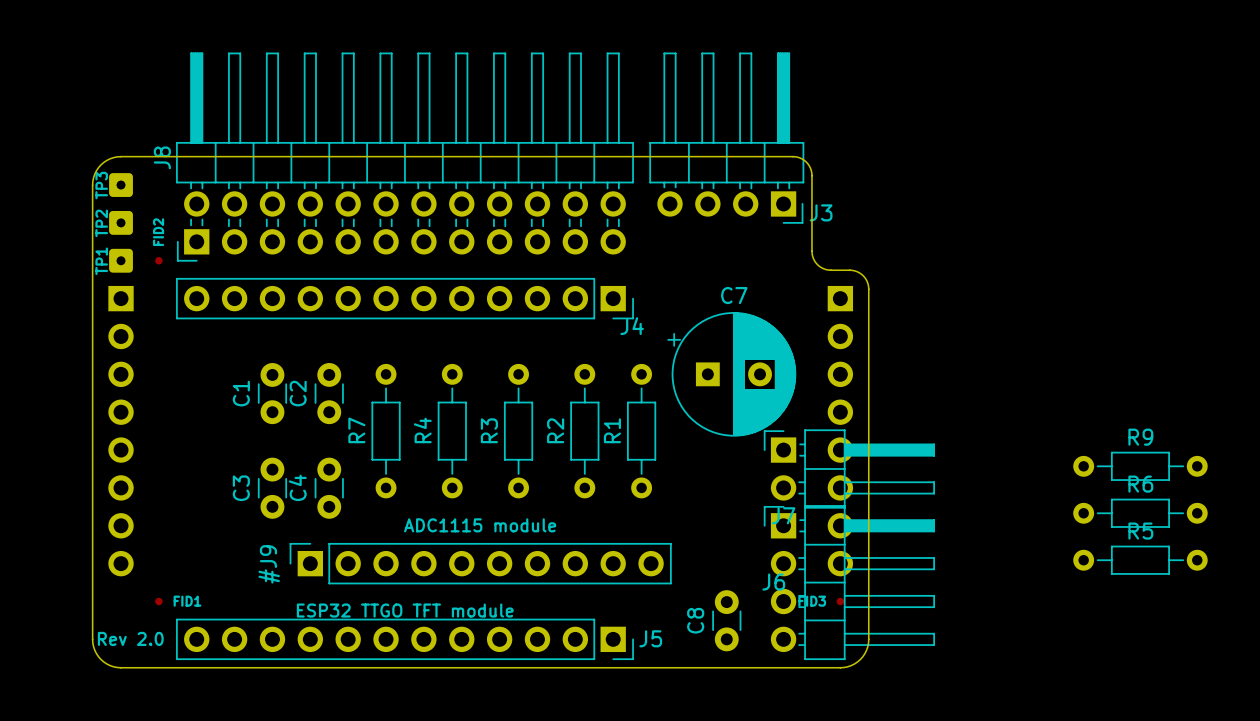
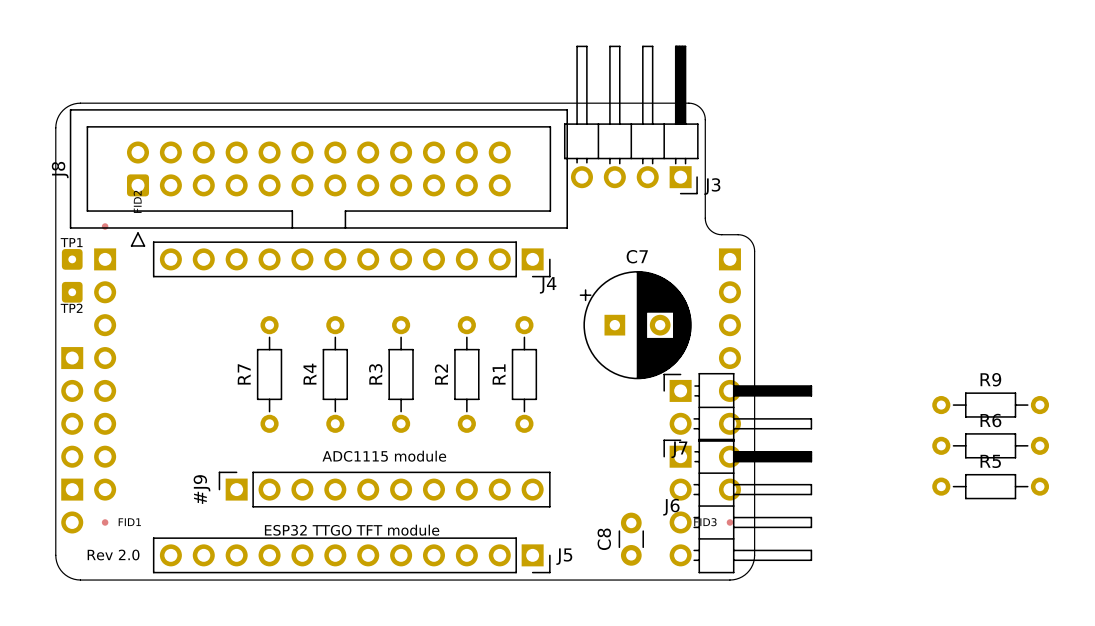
J8 footprint: [176, 52, 634, 262] -> [69, 109, 568, 247]
J8 name position: J8 (162, 157) -> J8 (60, 170)
board edge: (811, 175) (806, 162) (793, 156) (121, 156) (103, 162) (96, 170) (92, 185) (92, 639) (94, 650) (100, 659) (110, 665) (121, 667) -> (705, 152) (704, 115) (698, 106) (691, 103) (80, 103) (65, 108) (59, 115) (55, 127) (56, 558) (60, 570) (71, 578) (105, 580)
TP3: (121, 185) -> none
TP2 position: (121, 222) -> (72, 292)
TP2 name rotation: 0° (101, 223) -> 90° clockwise (71, 308)
TP1 position: (121, 260) -> (72, 259)
FID2 position: (158, 260) -> (105, 226)
TP1 name rotation: 0° (101, 261) -> 90° clockwise (71, 242)
C1: (272, 393) -> none
C2: (329, 393) -> none
R7 name: R7 (356, 430) -> R4 (309, 374)
R7: none -> (269, 374)
R4: (452, 431) -> none
R3 position: (518, 431) -> (401, 374)
R2 position: (584, 431) -> (466, 374)
R1 position: (641, 431) -> (524, 374)
part: none -> (72, 407)
C3: (272, 488) -> none
C4: (329, 488) -> none
text position: ADC1115 module (480, 525) -> ADC1115 module (384, 456)
#J9 position: (480, 563) -> (384, 489)
part: none -> (72, 506)
FID1 position: (158, 601) -> (105, 522)

